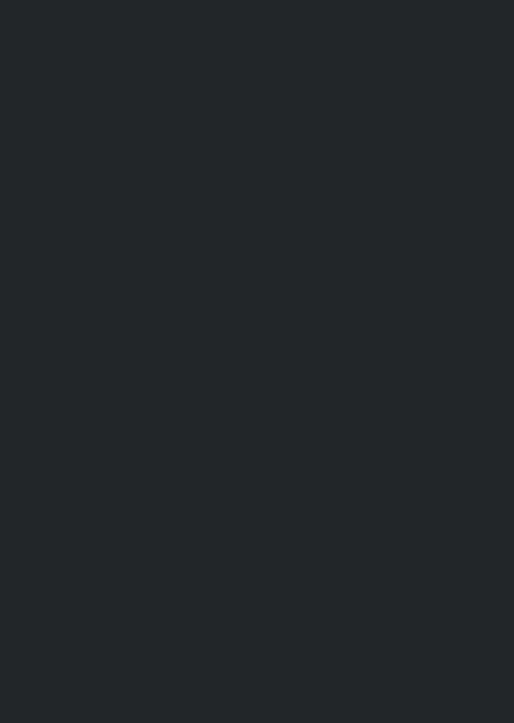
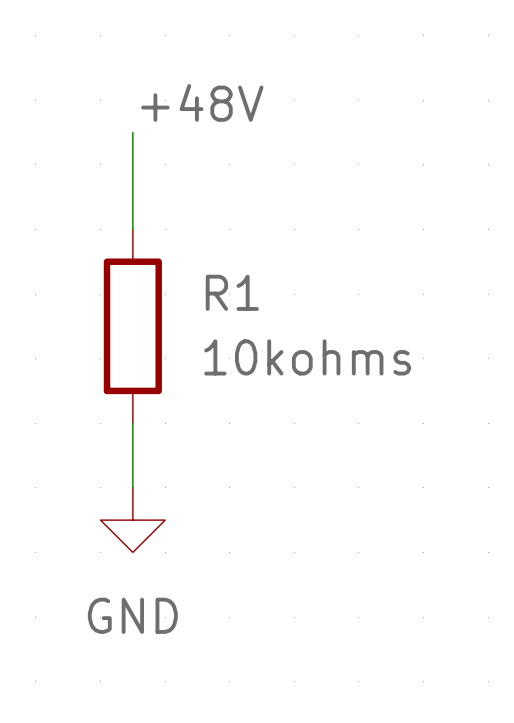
label: none -> +48V (202, 102)
wire: none -> (132, 132) (132, 229)
R1: none -> 10kohms (132, 326)
wire: none -> (132, 423) (132, 487)
power symbol: none -> GND (132, 520)

